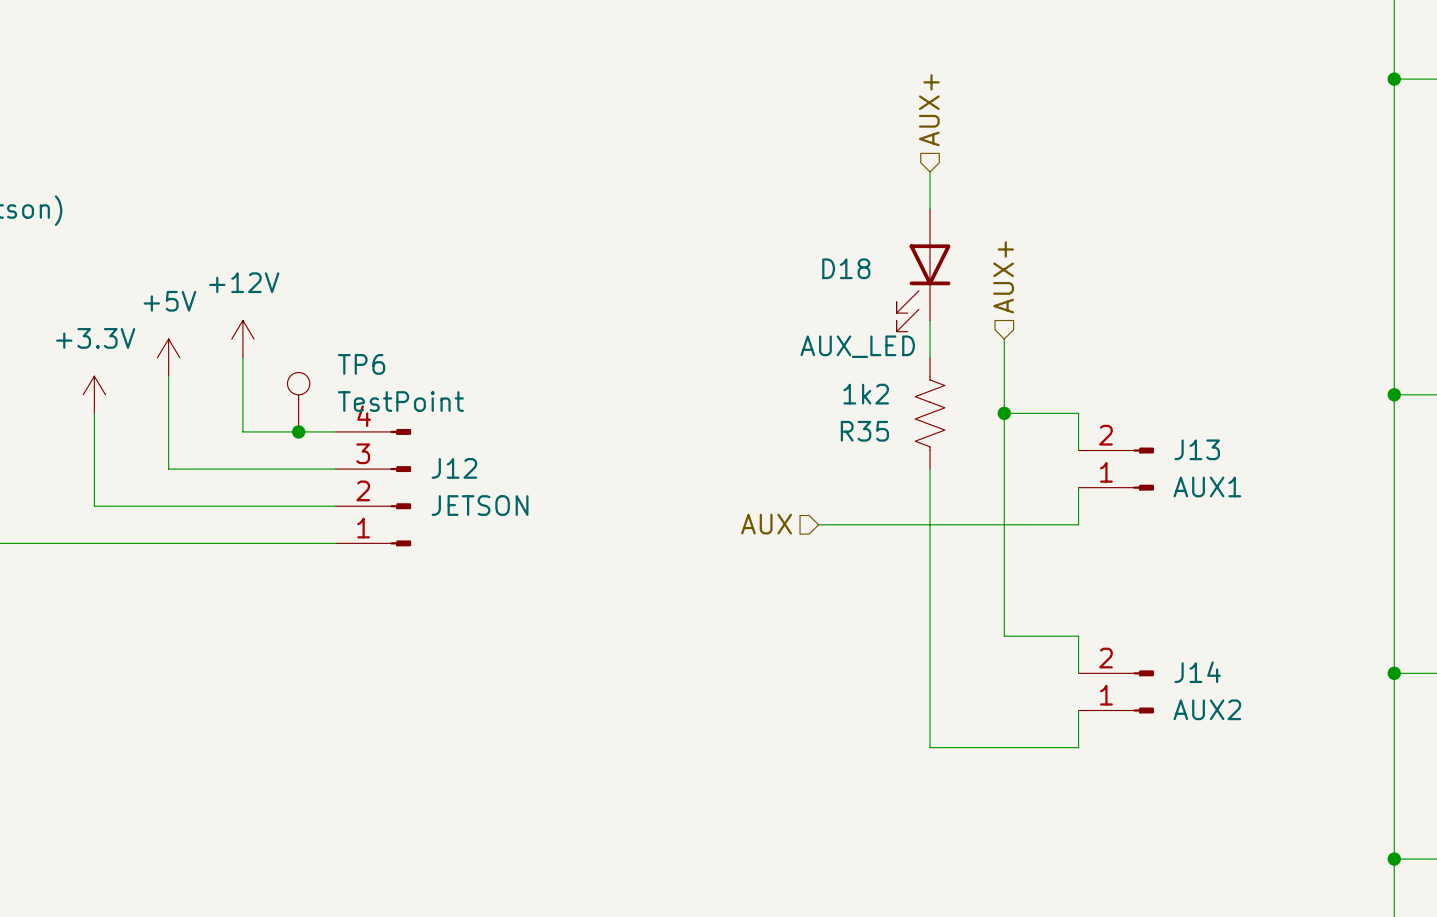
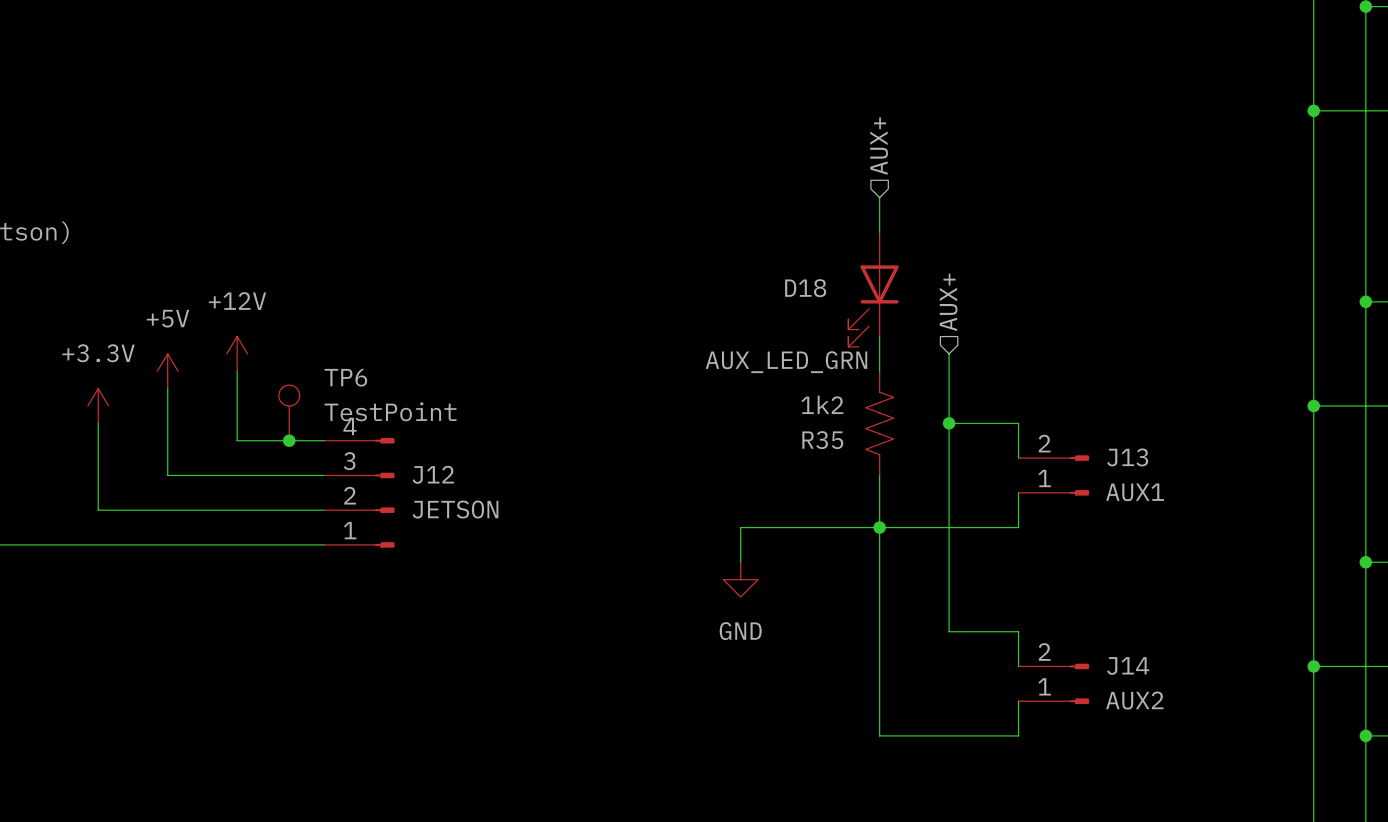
D18 value: AUX_LED (857, 346) -> AUX_LED_GRN (786, 362)
hierarchical label: AUX (766, 524) -> none
wire: none -> (775, 527) (740, 527) (740, 562)
junction: none -> (879, 527)
power symbol: none -> GND (740, 579)

